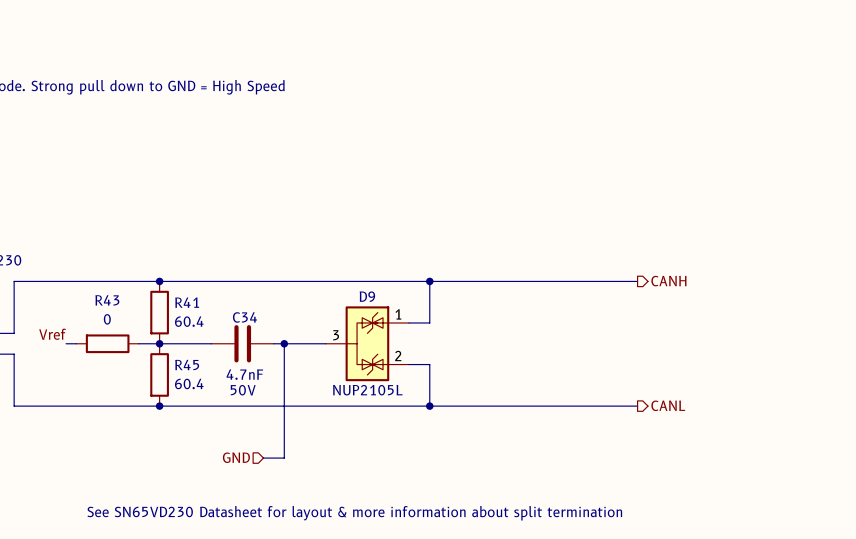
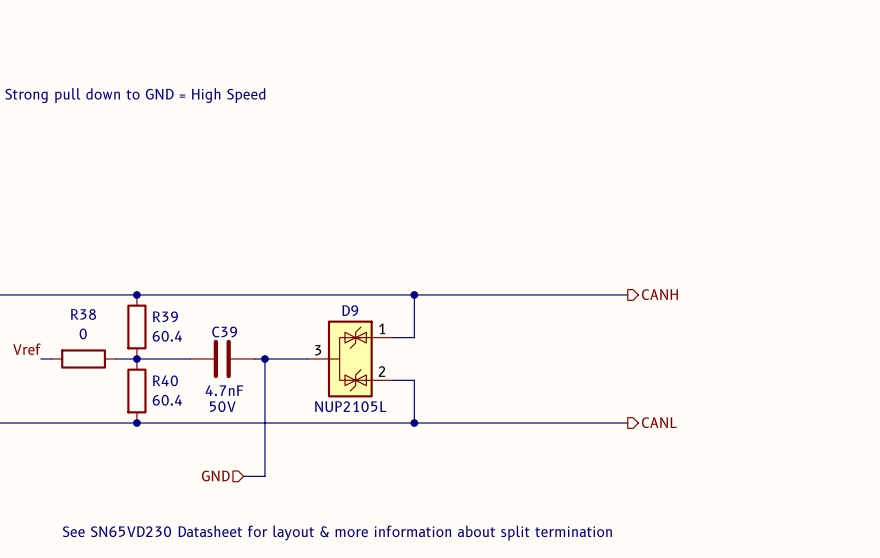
R43 name: R43 (107, 300) -> R38 (83, 314)
R41 name: R41 (187, 302) -> R39 (165, 316)
C34 name: C34 (244, 317) -> C39 (224, 331)
R45 name: R45 (187, 364) -> R40 (165, 380)

